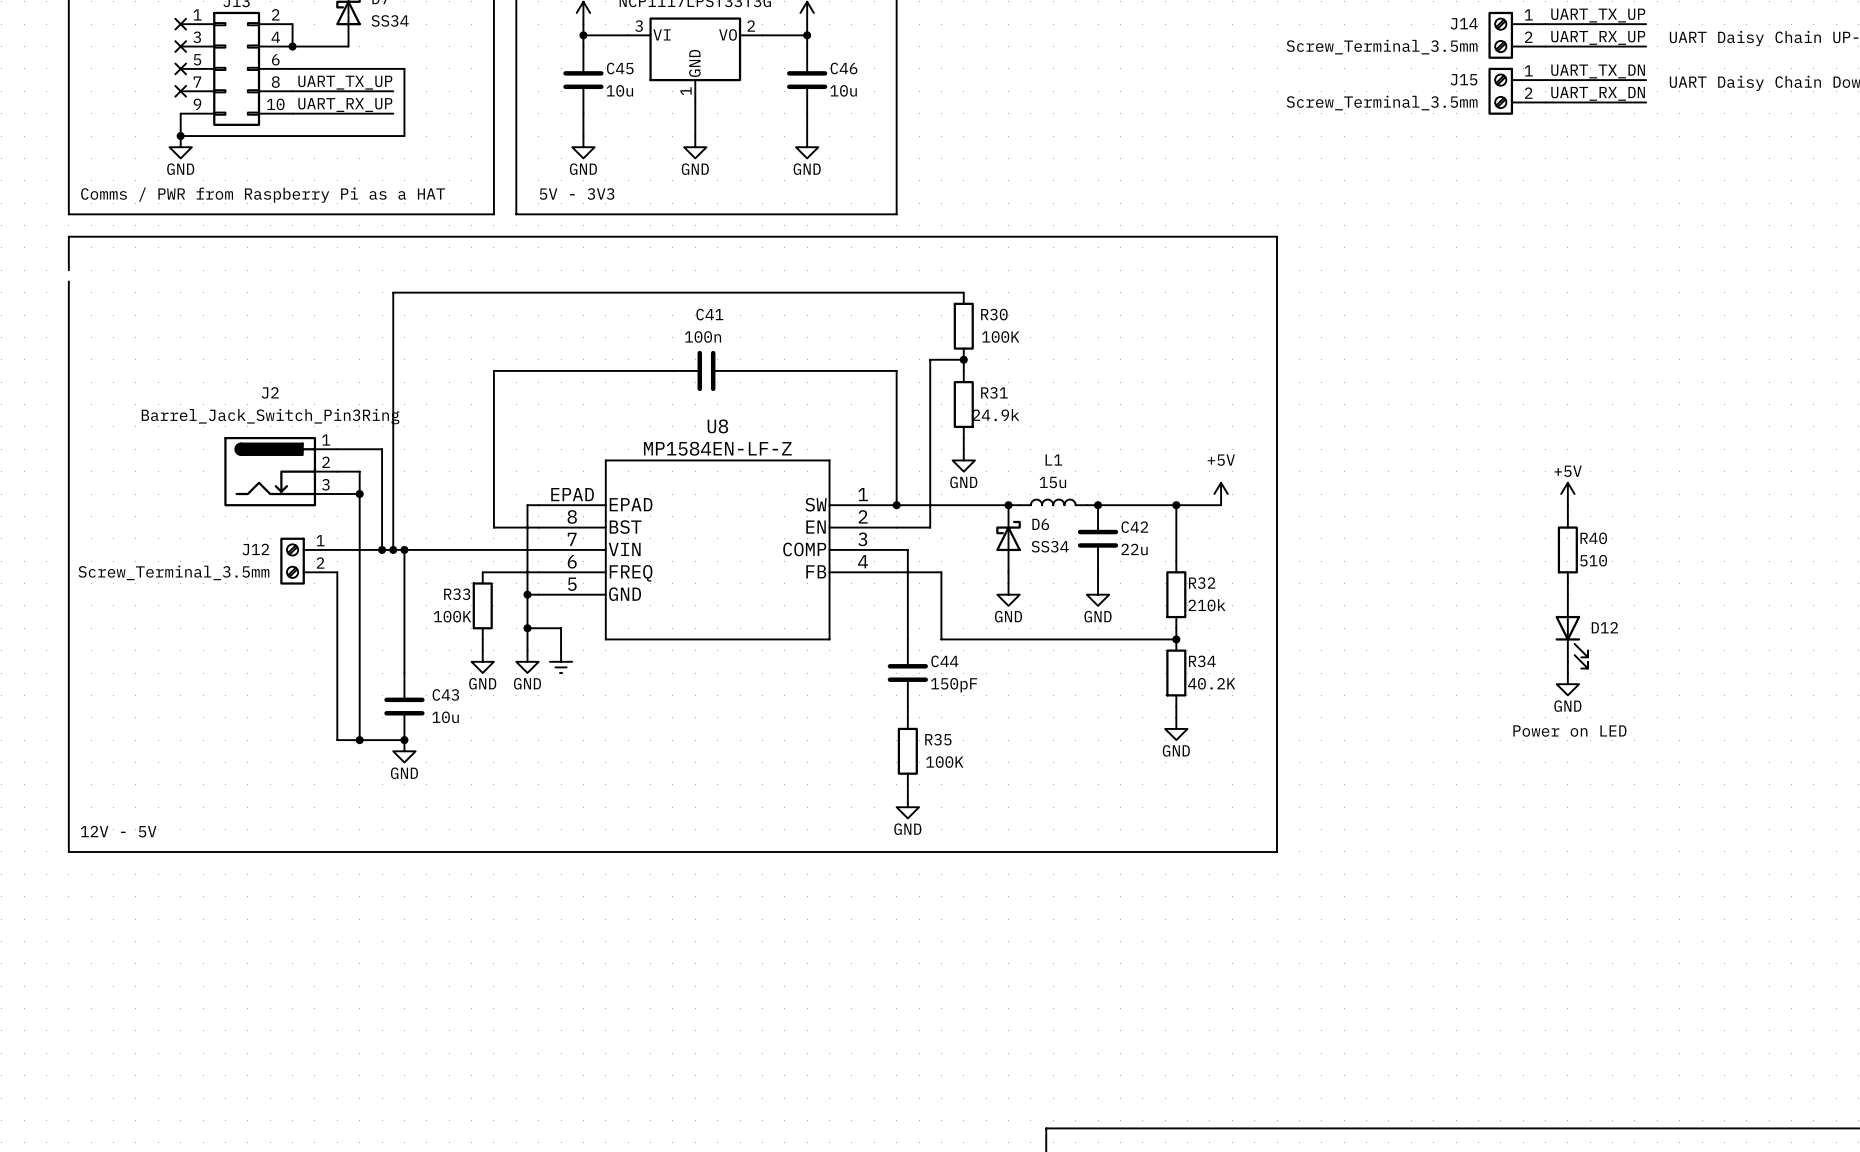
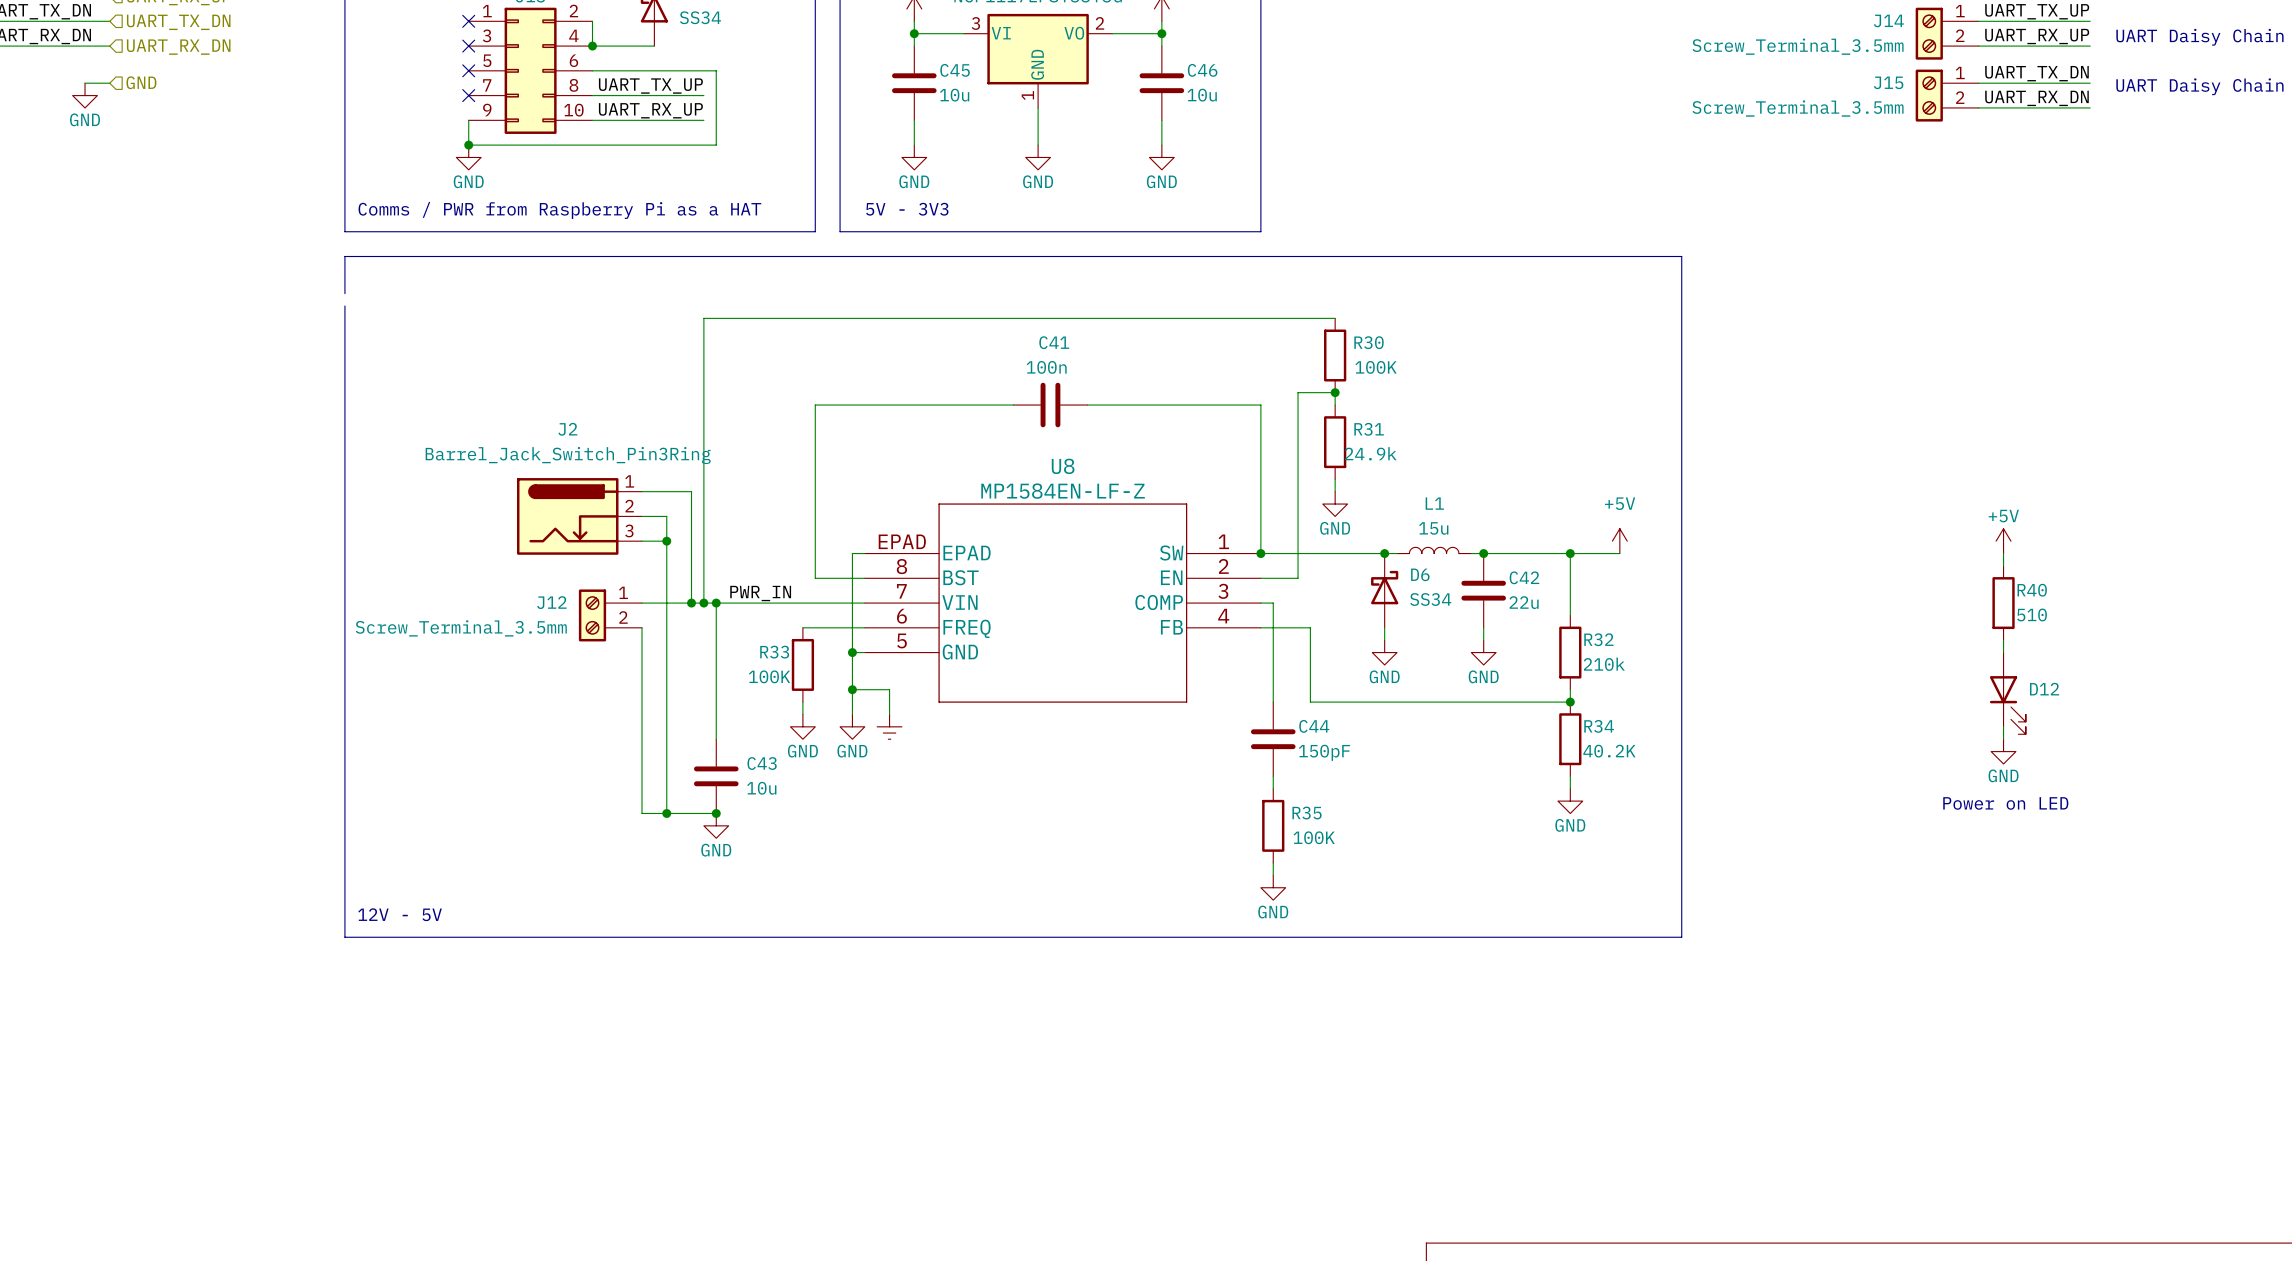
label: none -> PWR_IN (760, 593)

